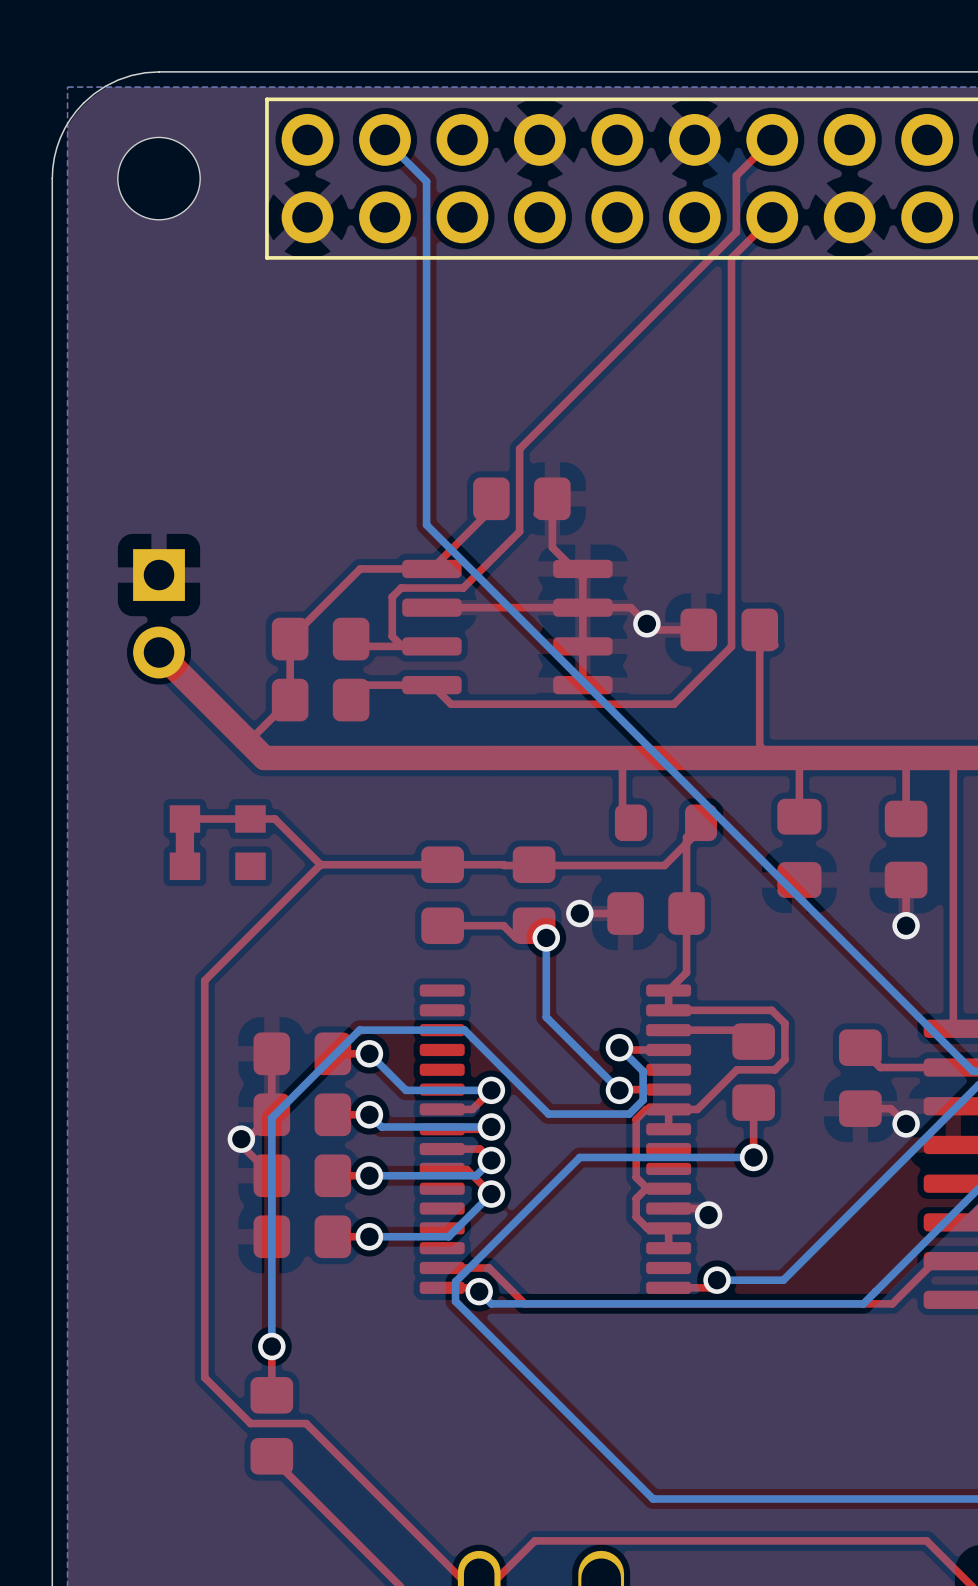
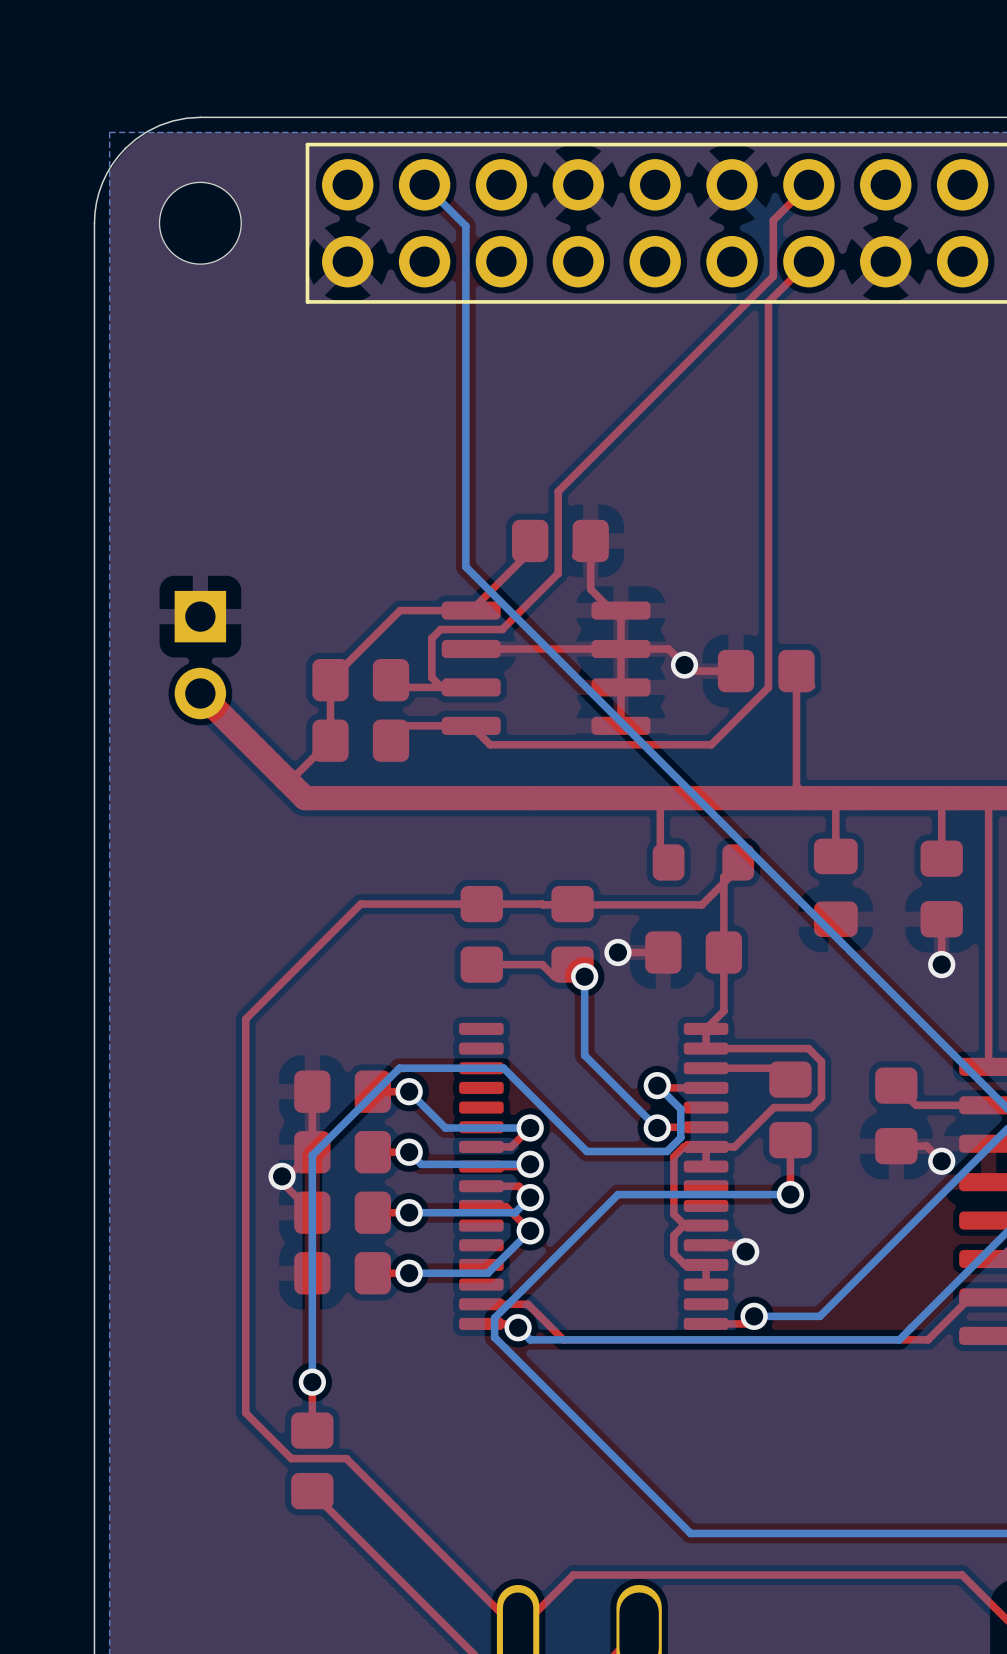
part: (217, 842) -> none
top track: (320, 864) (274, 818) (184, 818) (184, 866) -> none

